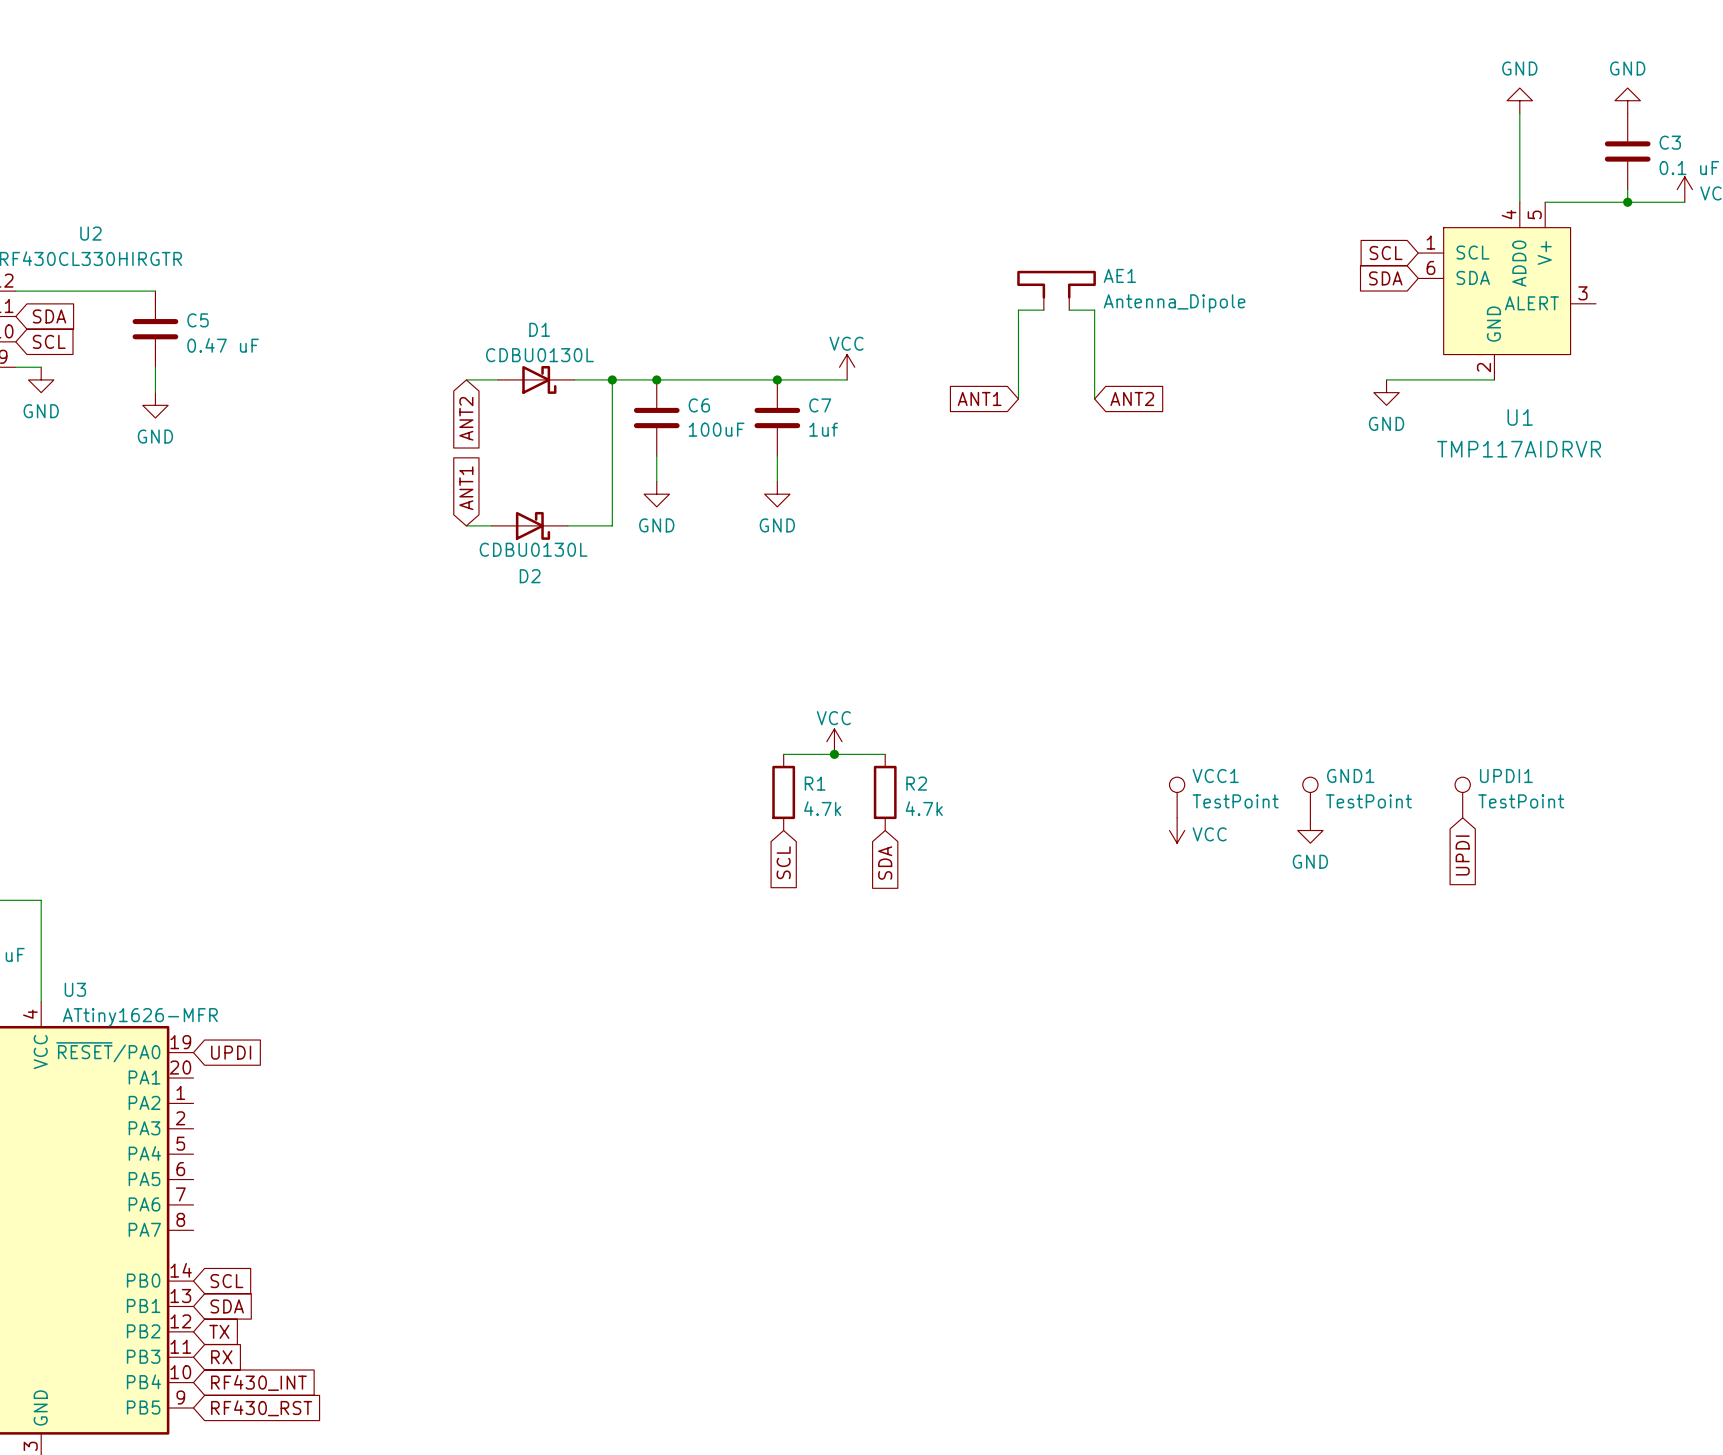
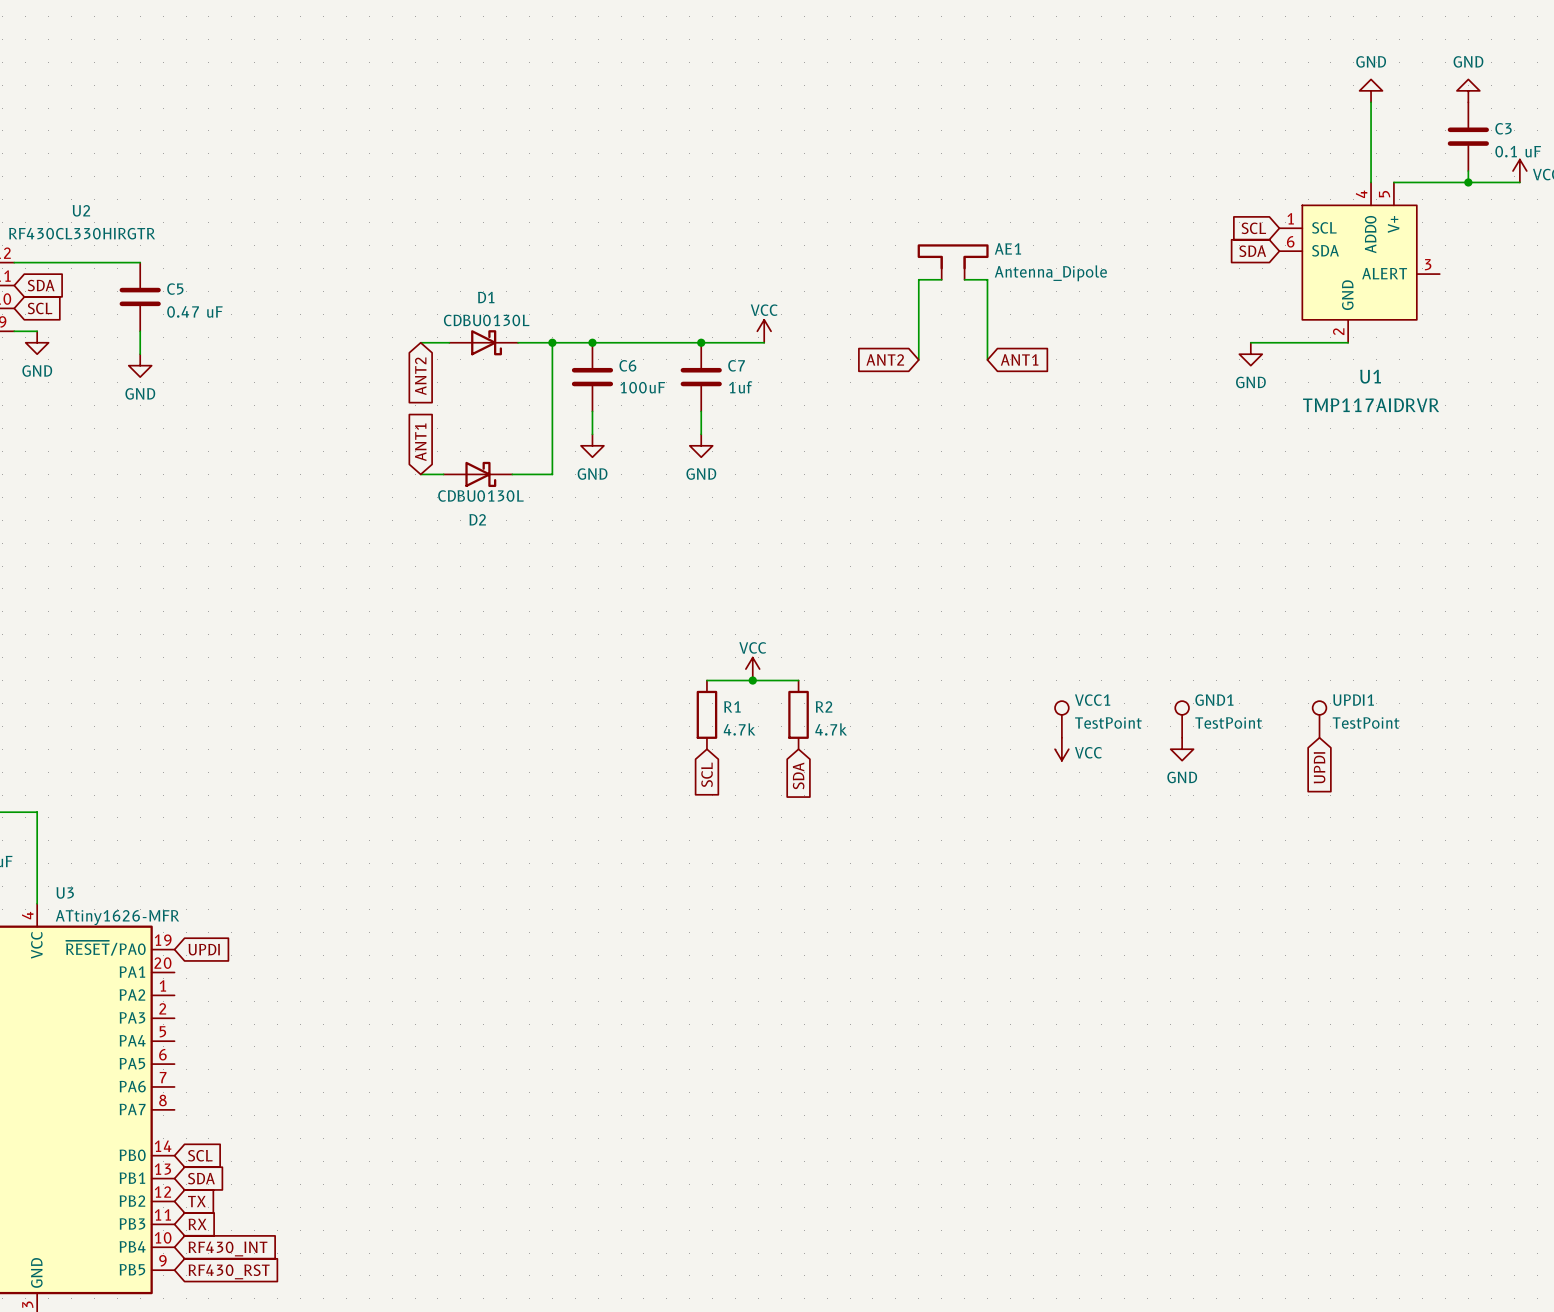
global label: ANT1 (979, 398) -> ANT2 (885, 359)
global label: ANT2 (1132, 398) -> ANT1 (1019, 359)

